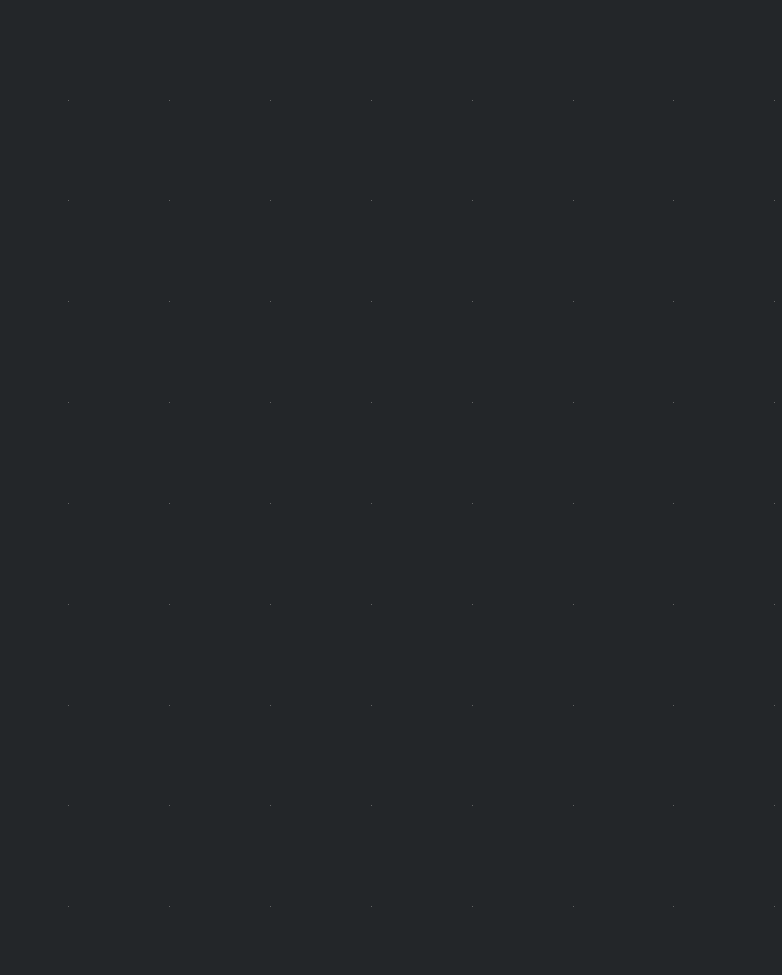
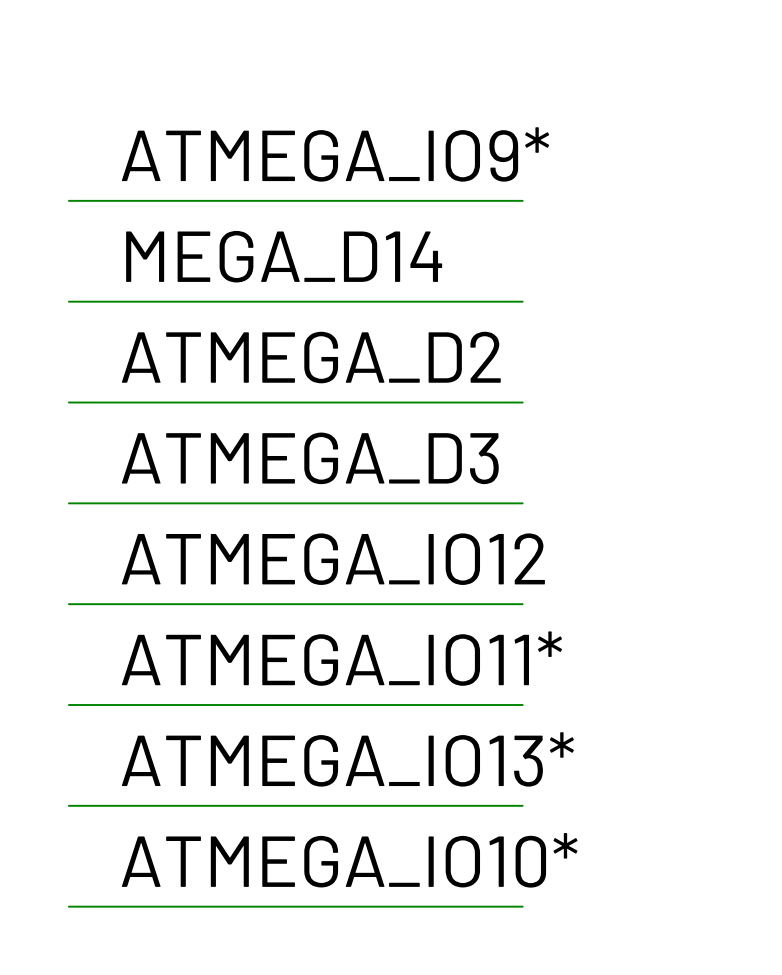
label: none -> ATMEGA_IO9* (335, 154)
wire: none -> (68, 200) (522, 200)
label: none -> MEGA_D14 (284, 256)
wire: none -> (68, 301) (522, 301)
label: none -> ATMEGA_D2 (311, 357)
wire: none -> (68, 402) (522, 402)
label: none -> ATMEGA_D3 (310, 458)
wire: none -> (68, 503) (522, 503)
label: none -> ATMEGA_IO12 (333, 559)
wire: none -> (68, 604) (522, 604)
label: none -> ATMEGA_IO11* (341, 658)
wire: none -> (68, 705) (522, 705)
label: none -> ATMEGA_IO13* (347, 759)
wire: none -> (68, 805) (522, 805)
label: none -> ATMEGA_IO10* (349, 860)
wire: none -> (68, 906) (522, 906)

